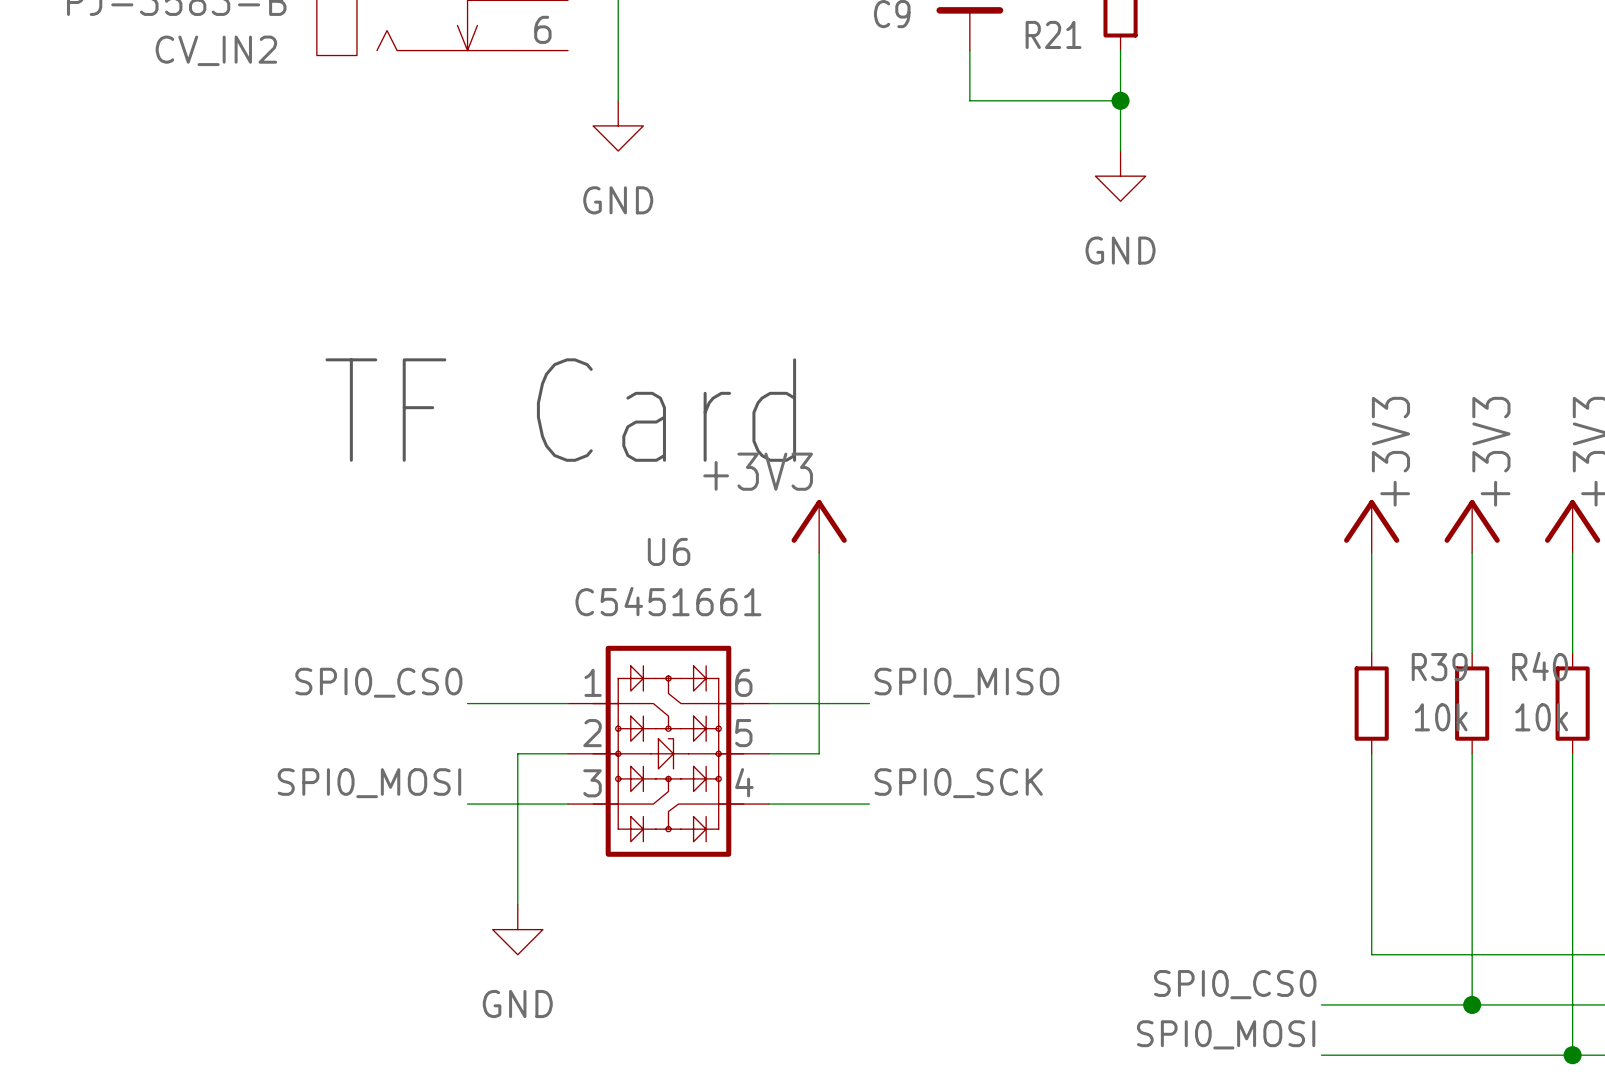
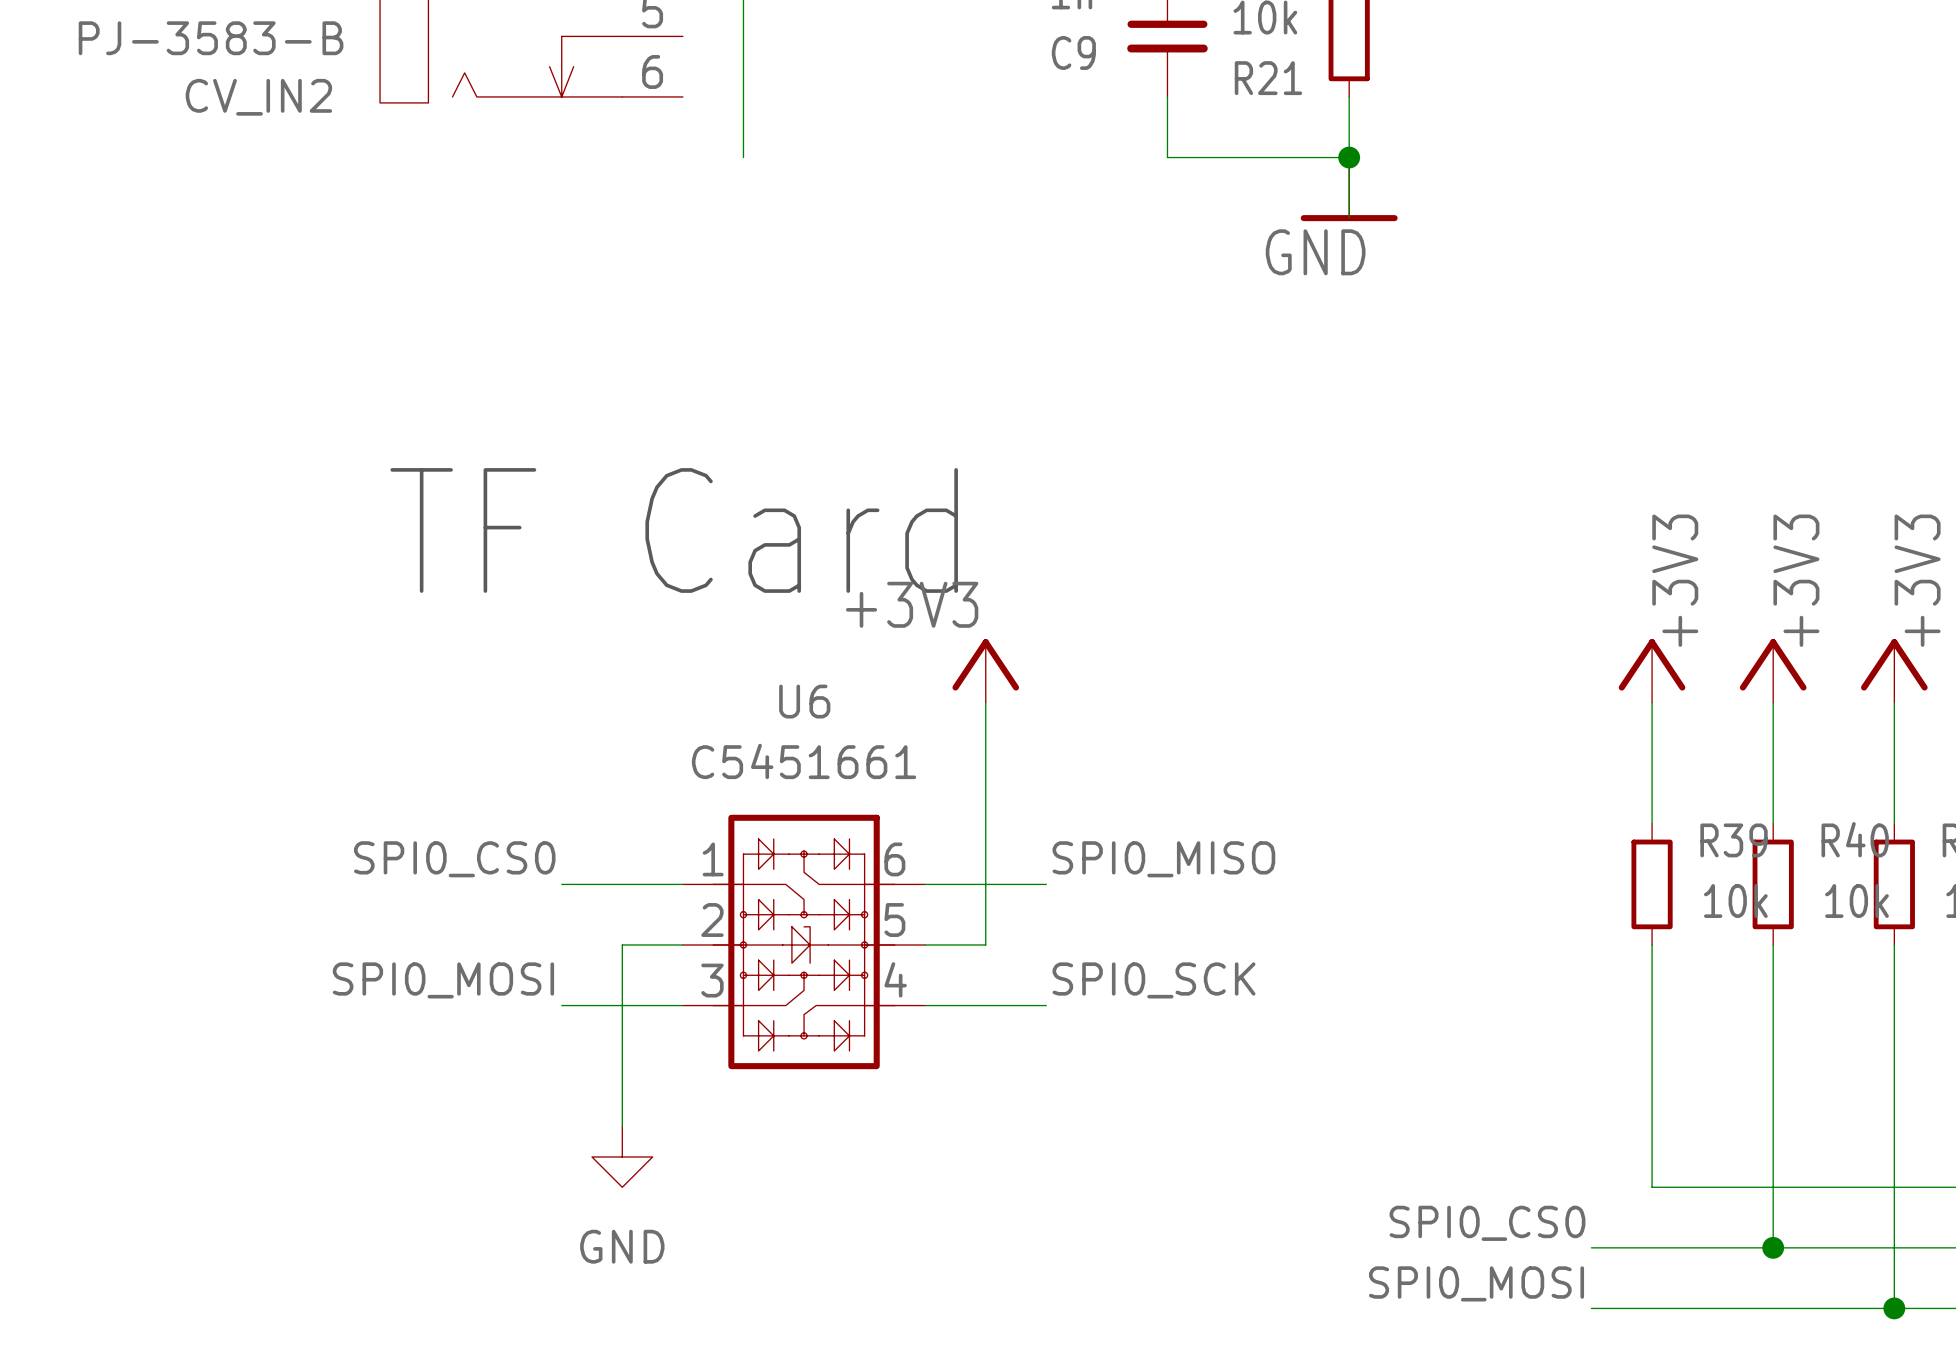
power symbol: GND (618, 125) -> none
power symbol: none -> GND (1349, 189)
power symbol: GND (1120, 176) -> none

